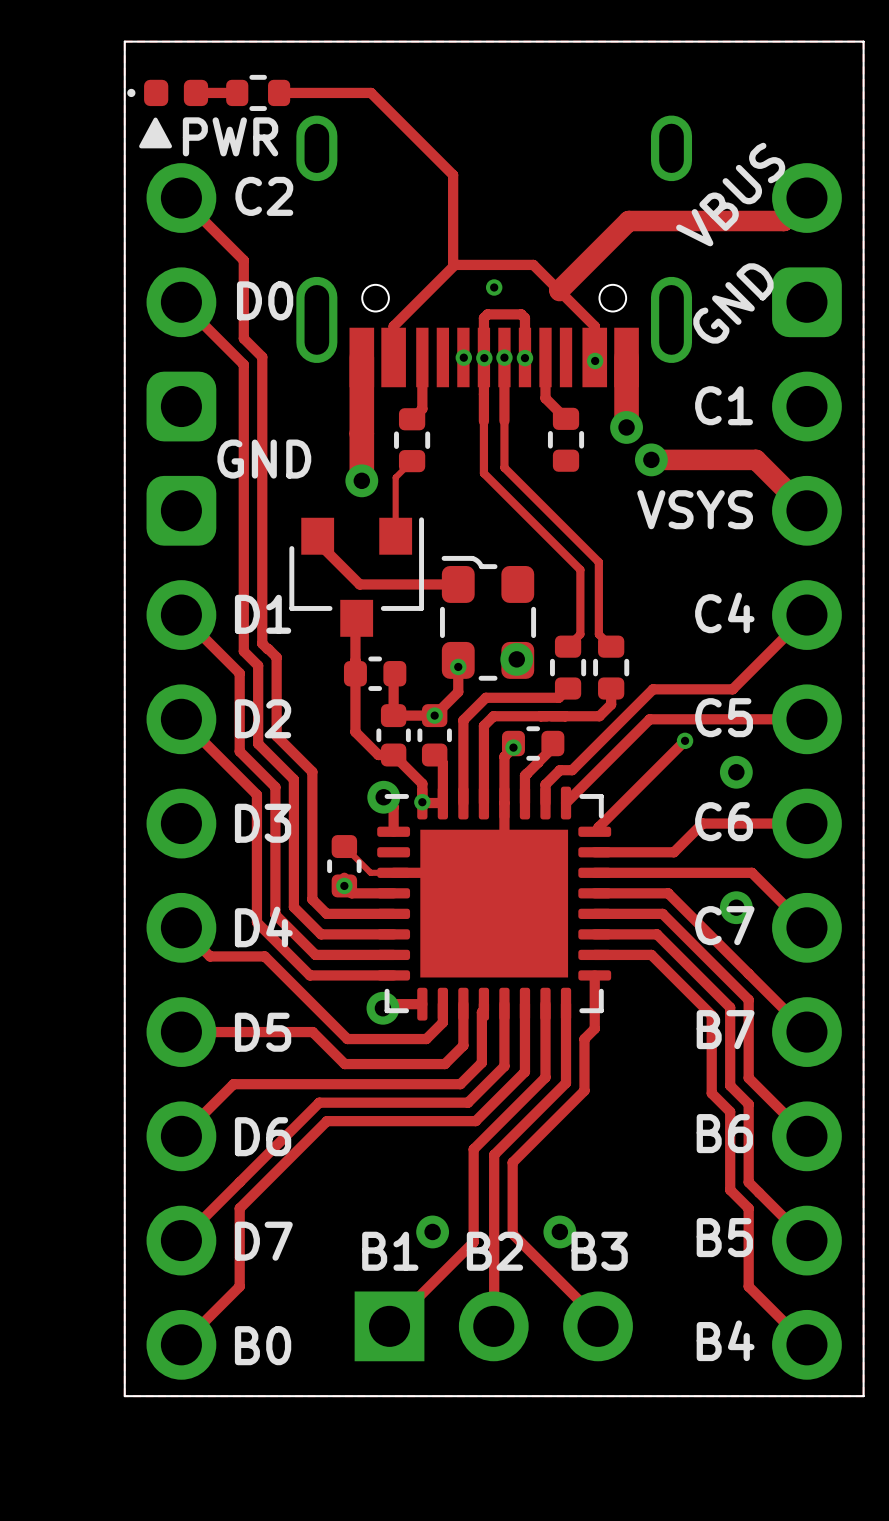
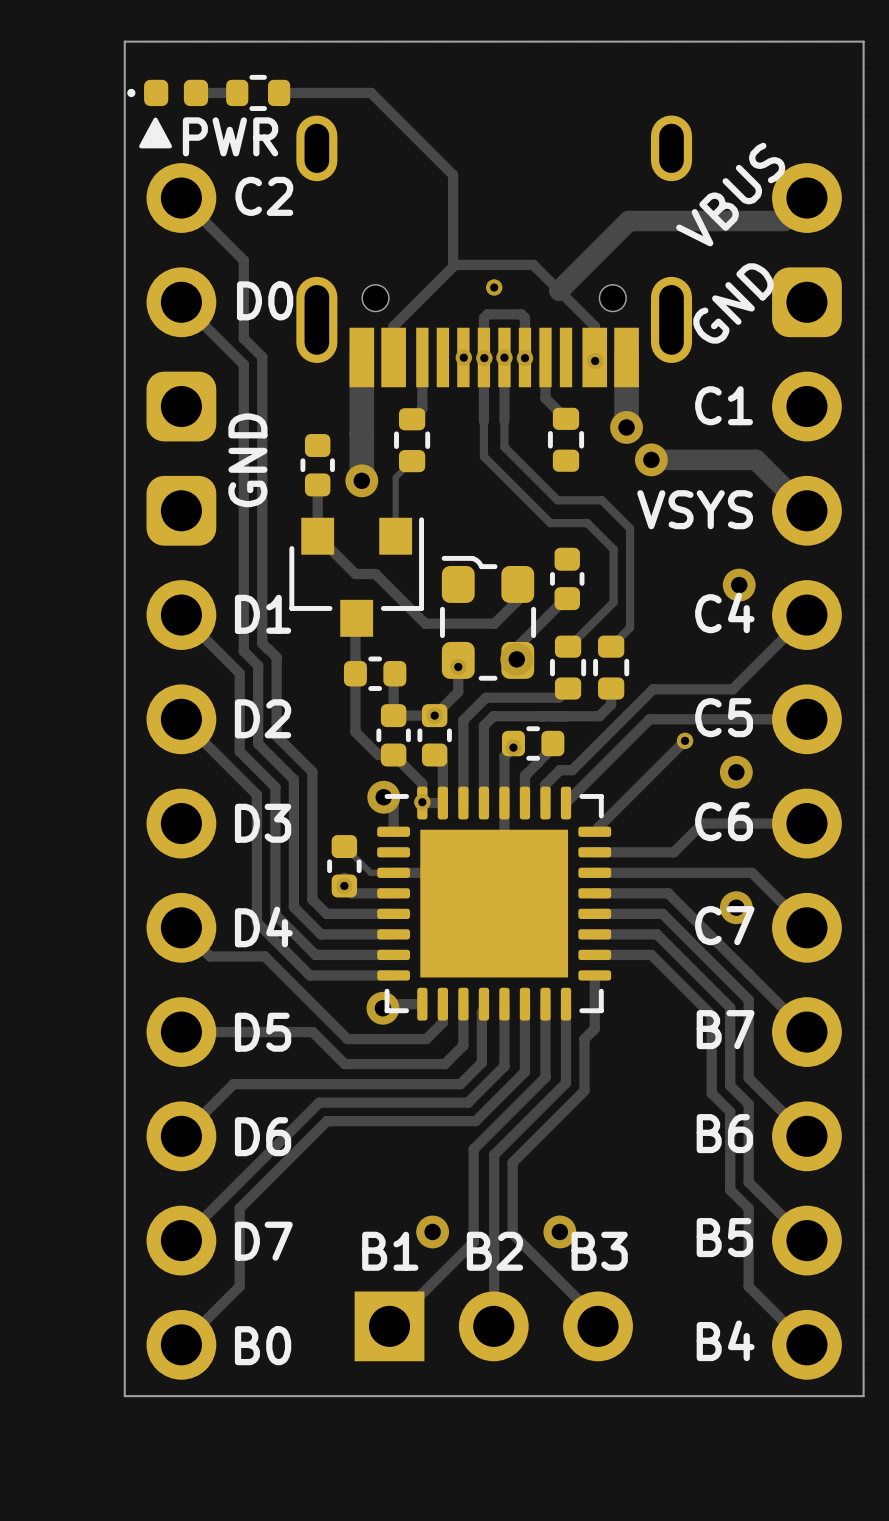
track: (504, 447) (504, 467) (598, 562) (598, 634) (611, 646) -> (504, 447) (557, 500) (601, 500) (630, 528) (630, 627) (611, 646)
track: (483, 456) (483, 473) (580, 569) (580, 634) (568, 646) -> (483, 456) (550, 523) (587, 523) (613, 549) (613, 602) (568, 646)
text rotation: 0° (264, 459) -> 90° counterclockwise (247, 460)
part: none -> (317, 465)
track: none -> (317, 484) (317, 536) (355, 574) (375, 574) (425, 623) (494, 623) (517, 600) (517, 584)
track: (317, 542) (359, 584) (458, 584) -> none
part: none -> (567, 578)
via: none -> (739, 585)
track: none -> (567, 598) (516, 647) (516, 659)

